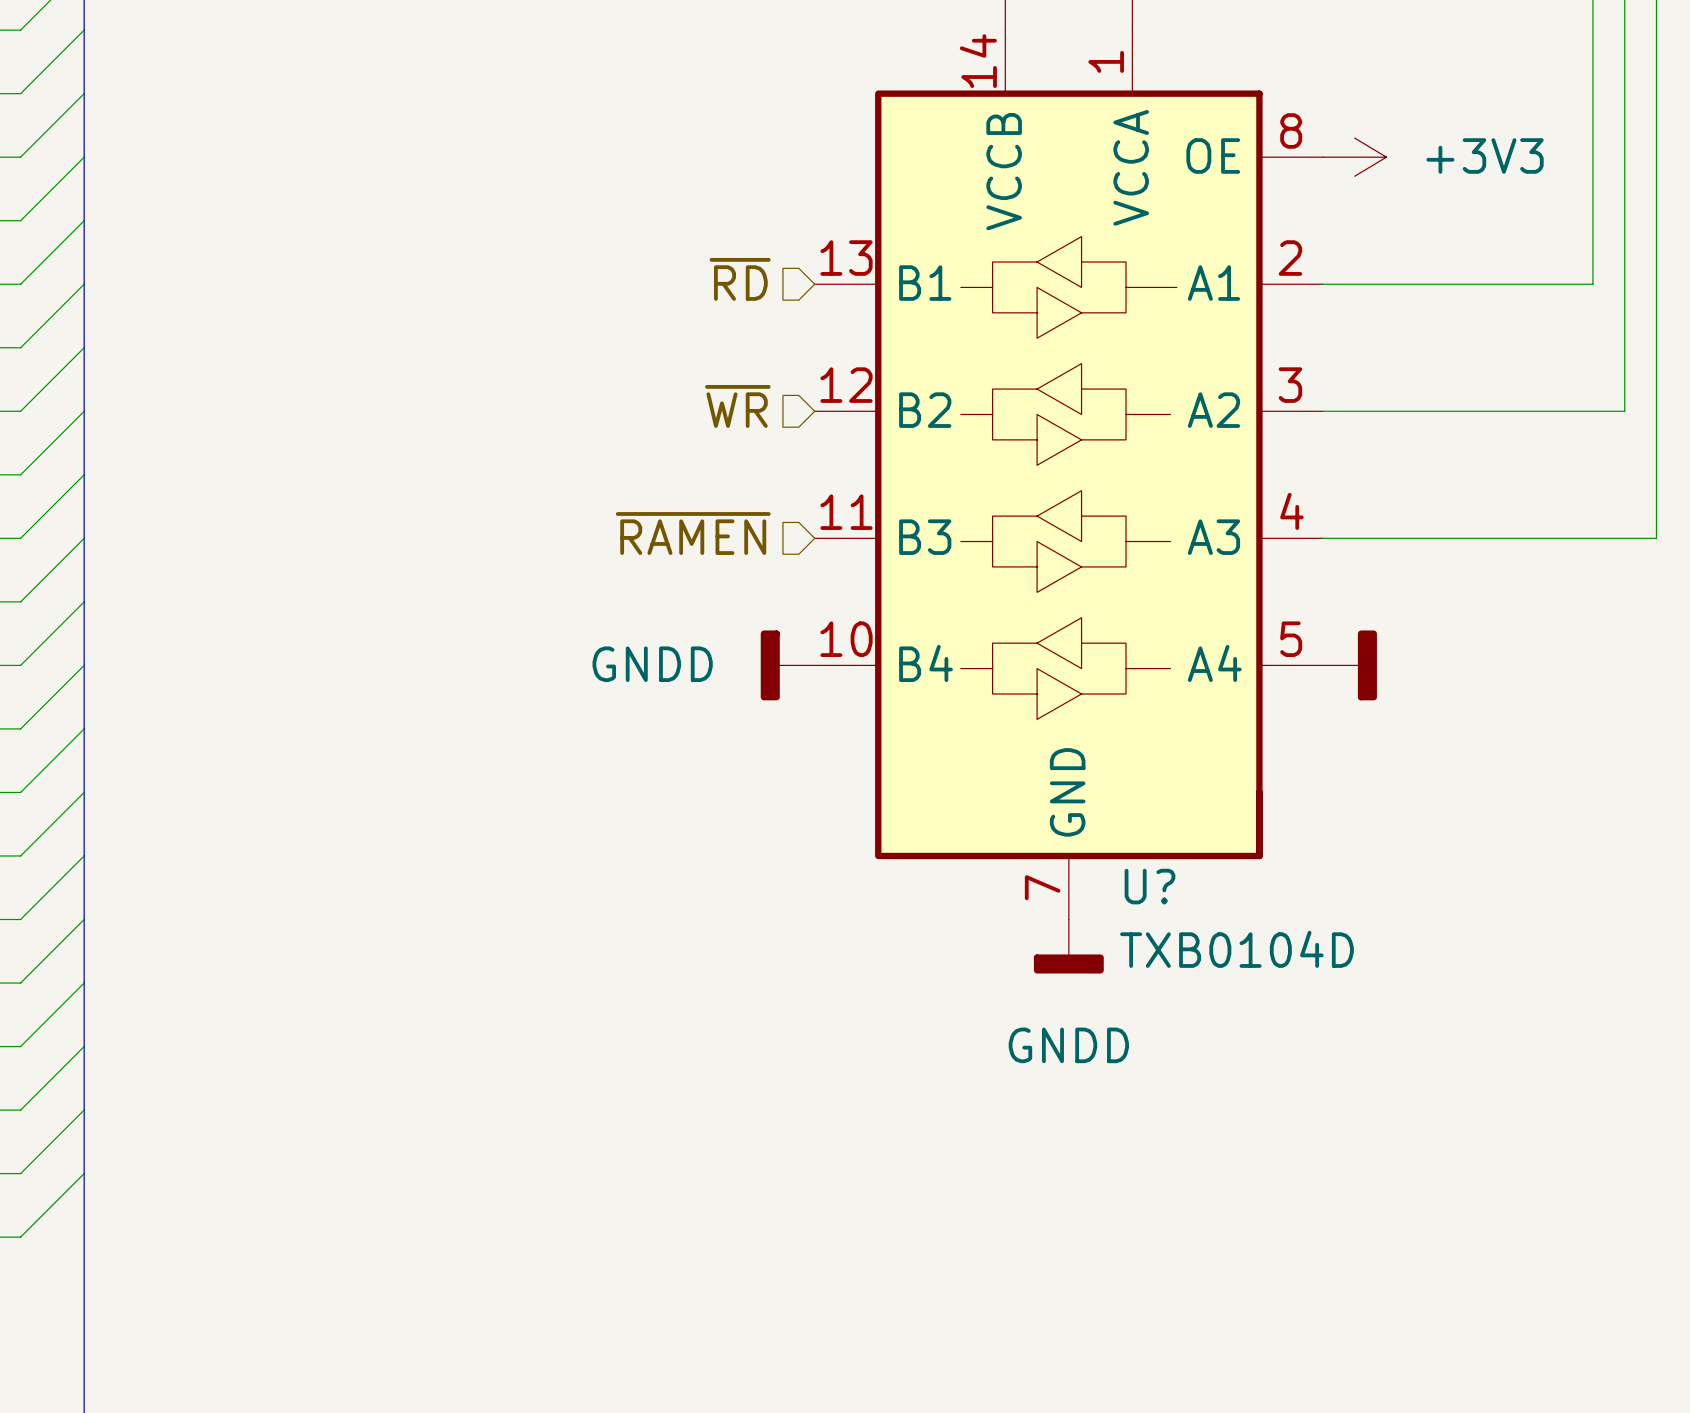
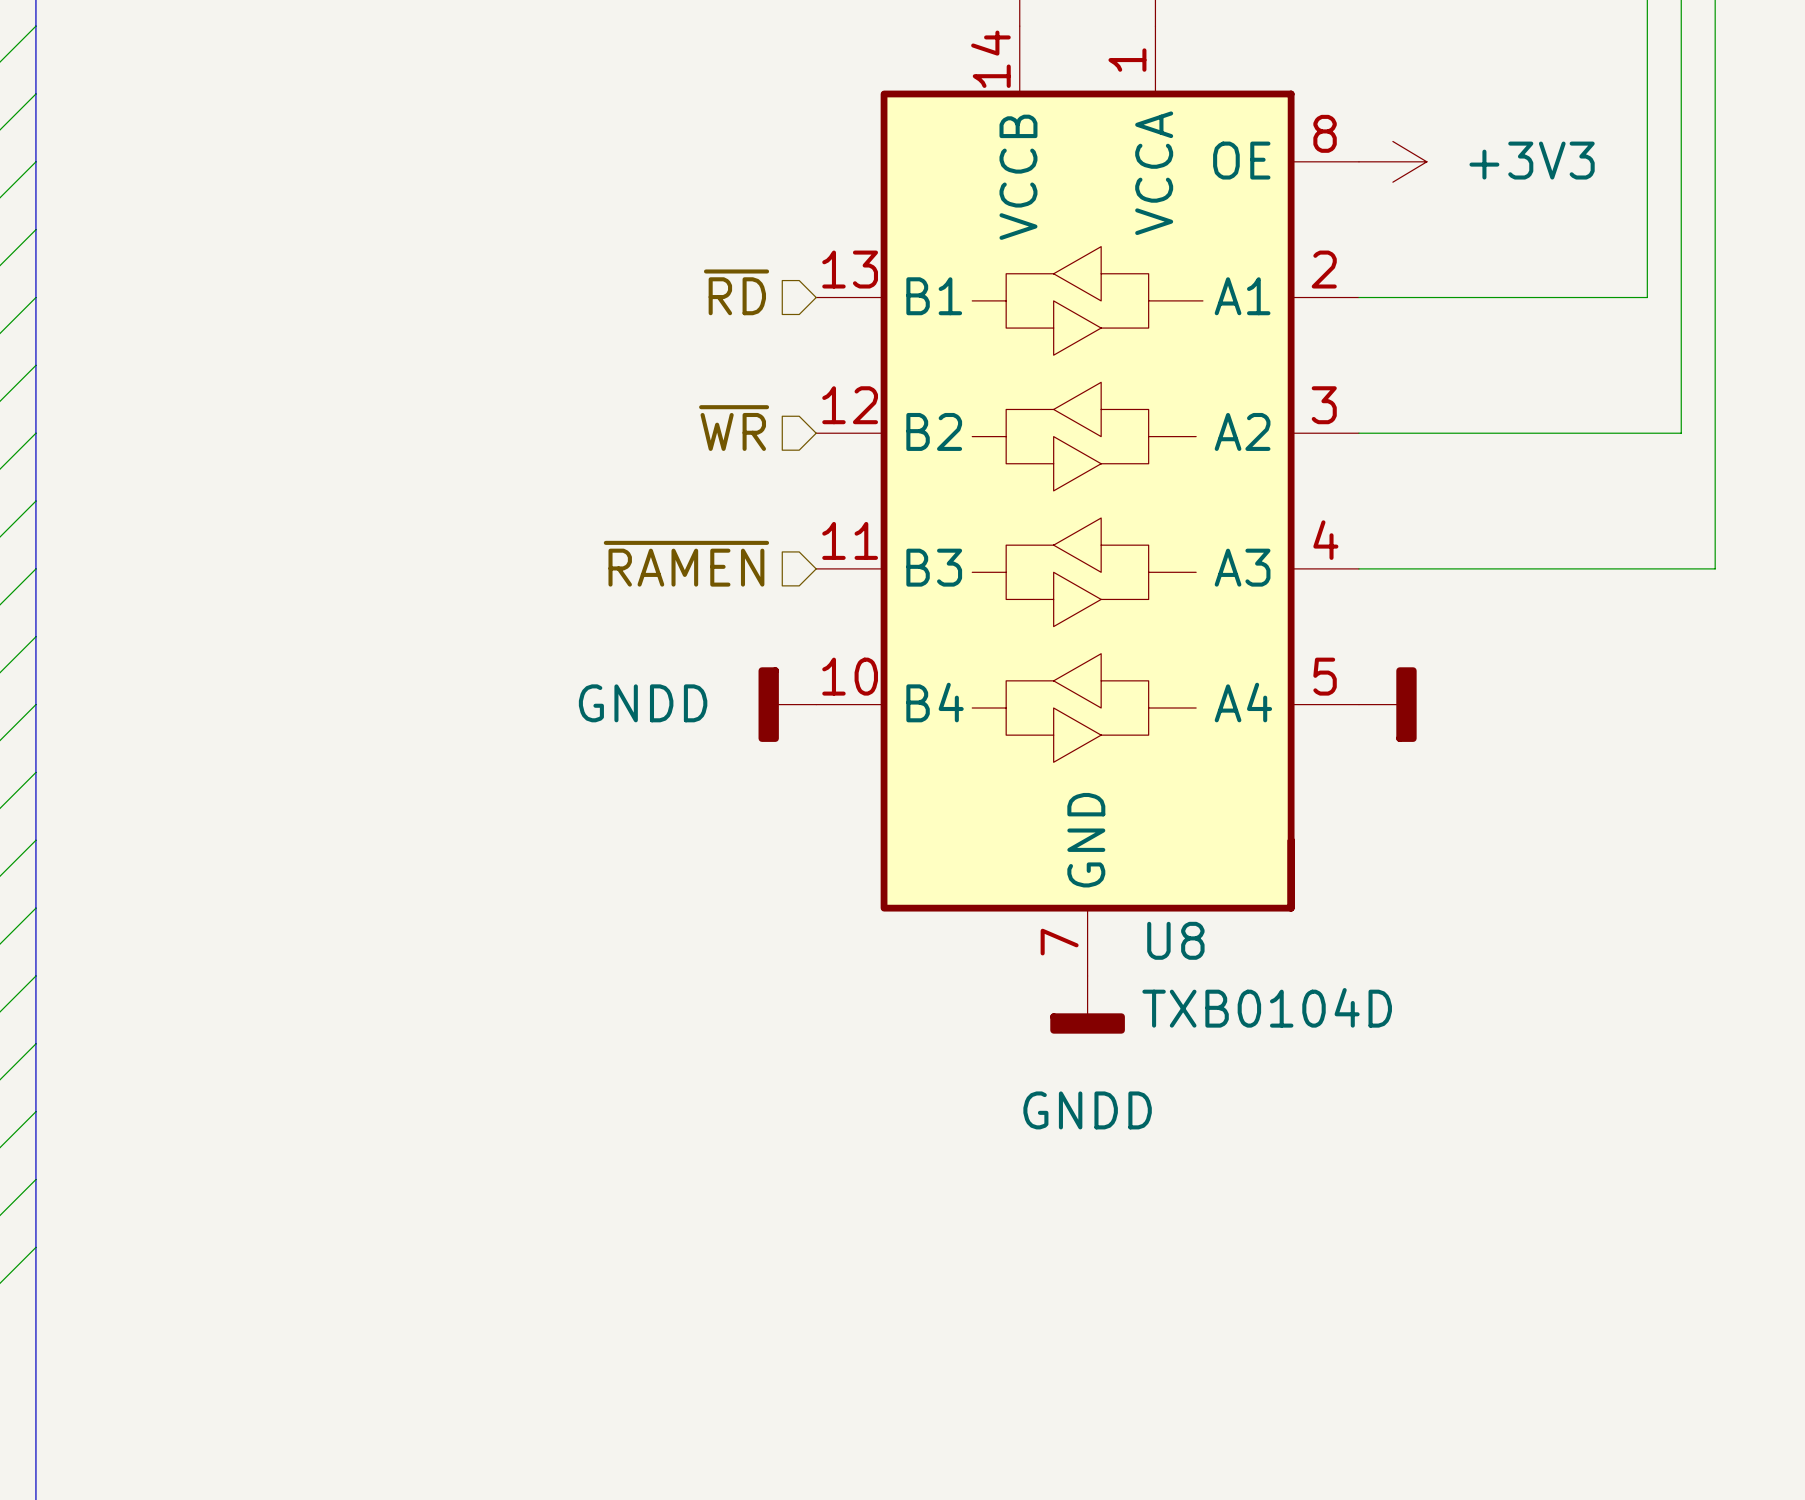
U? name: U? (1150, 886) -> U8 (1175, 940)

